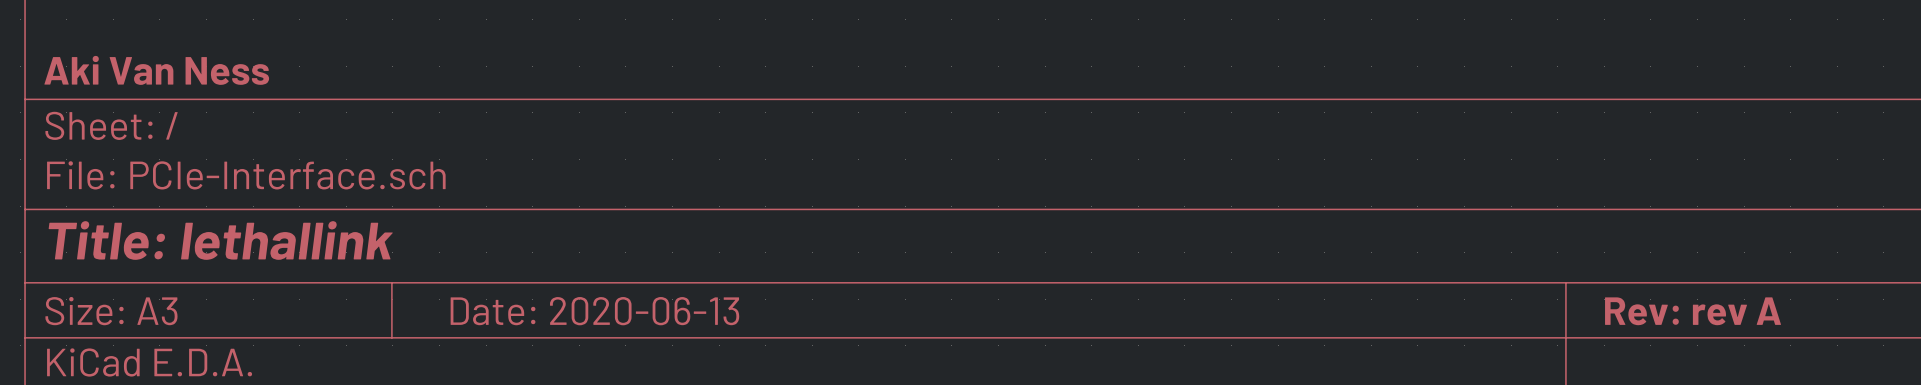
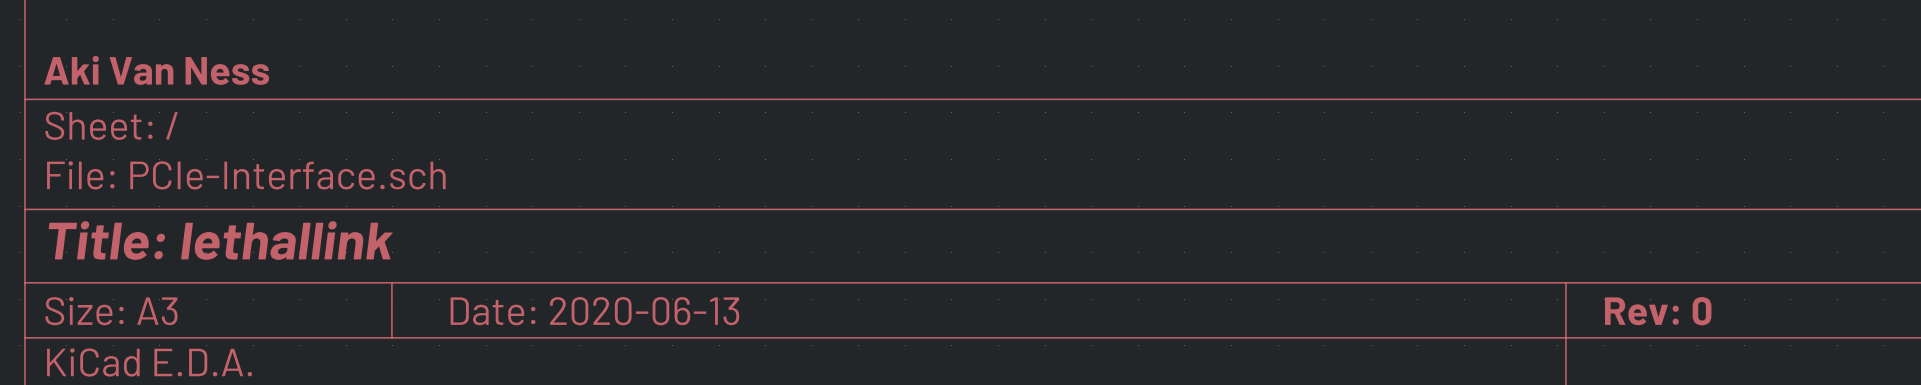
title block: Rev: rev A (1693, 311) -> Rev: 0 (1658, 311)

